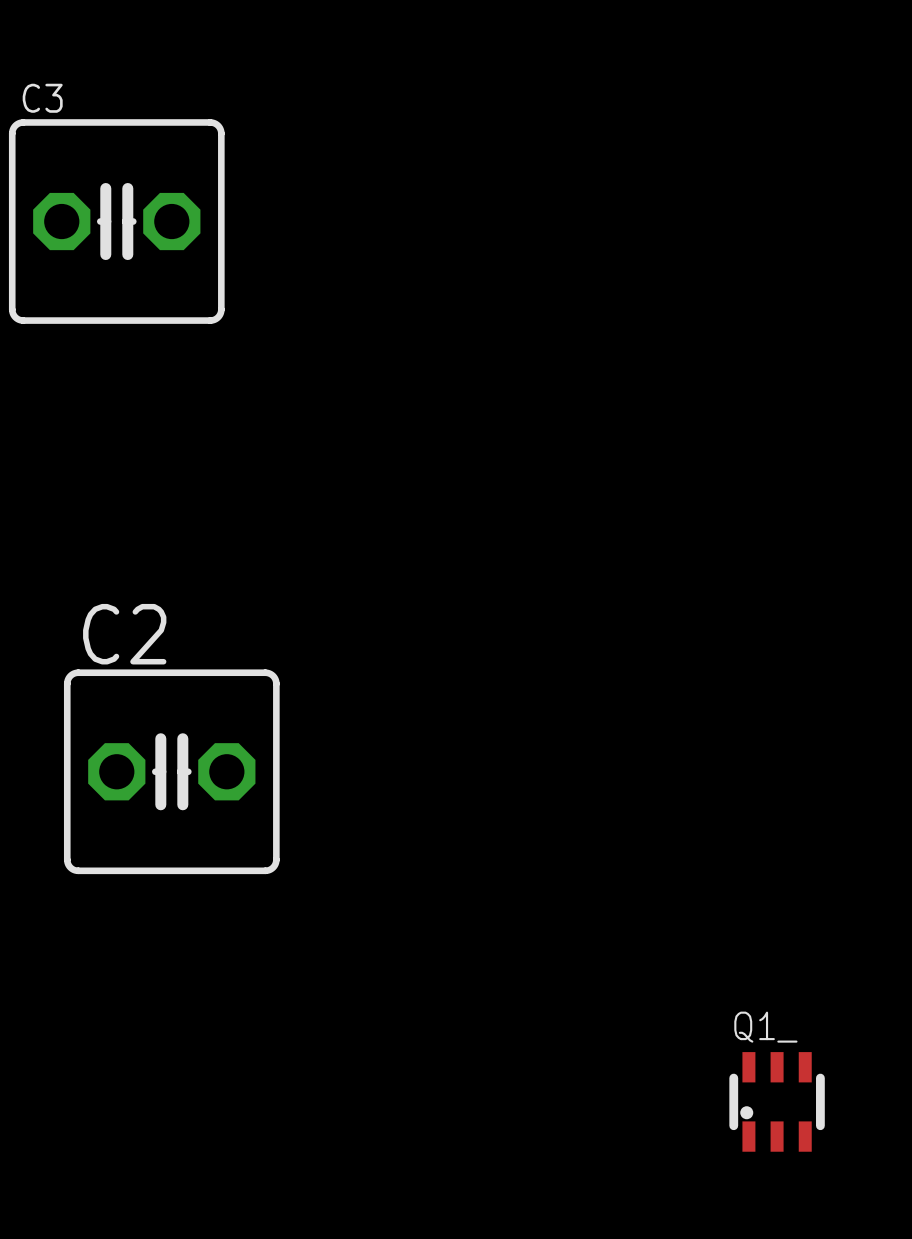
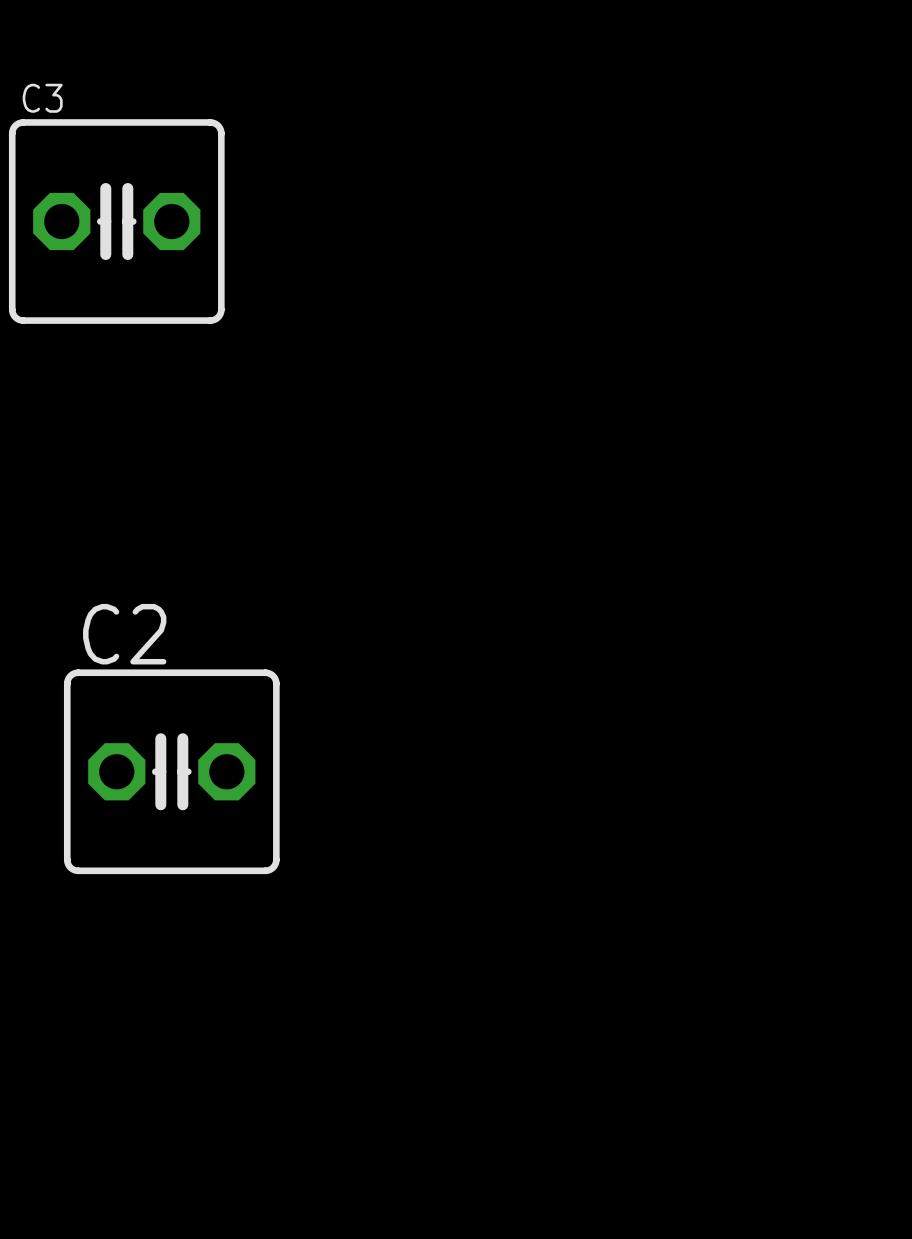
Q1_: (777, 1101) -> none

